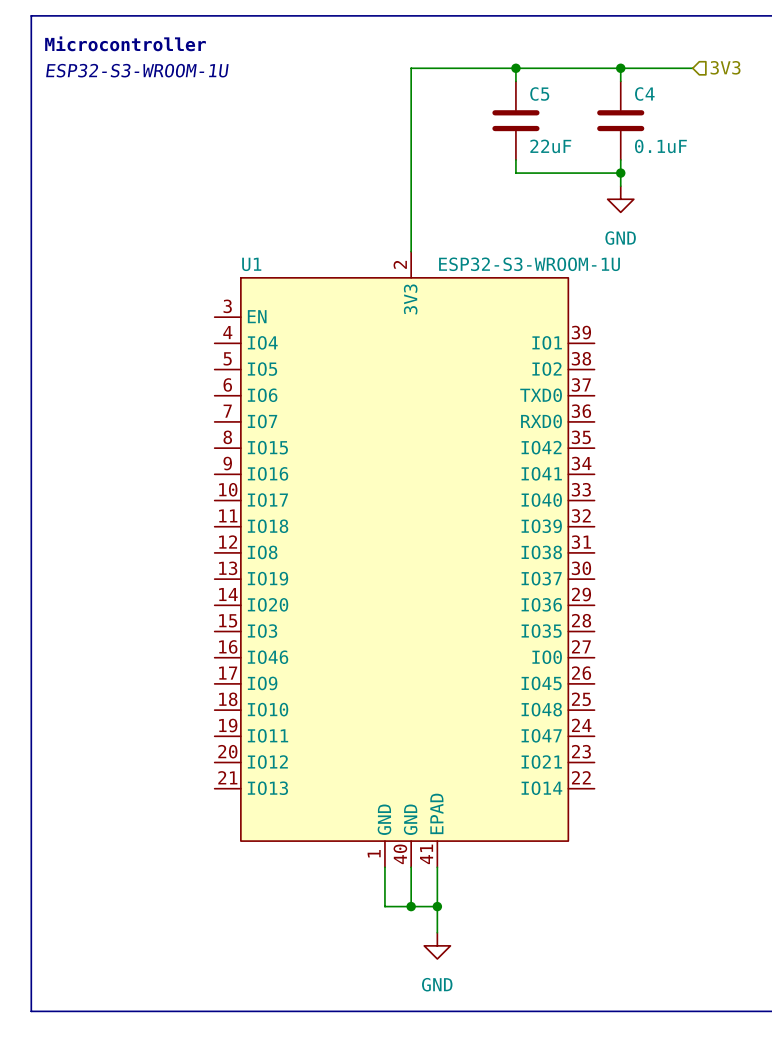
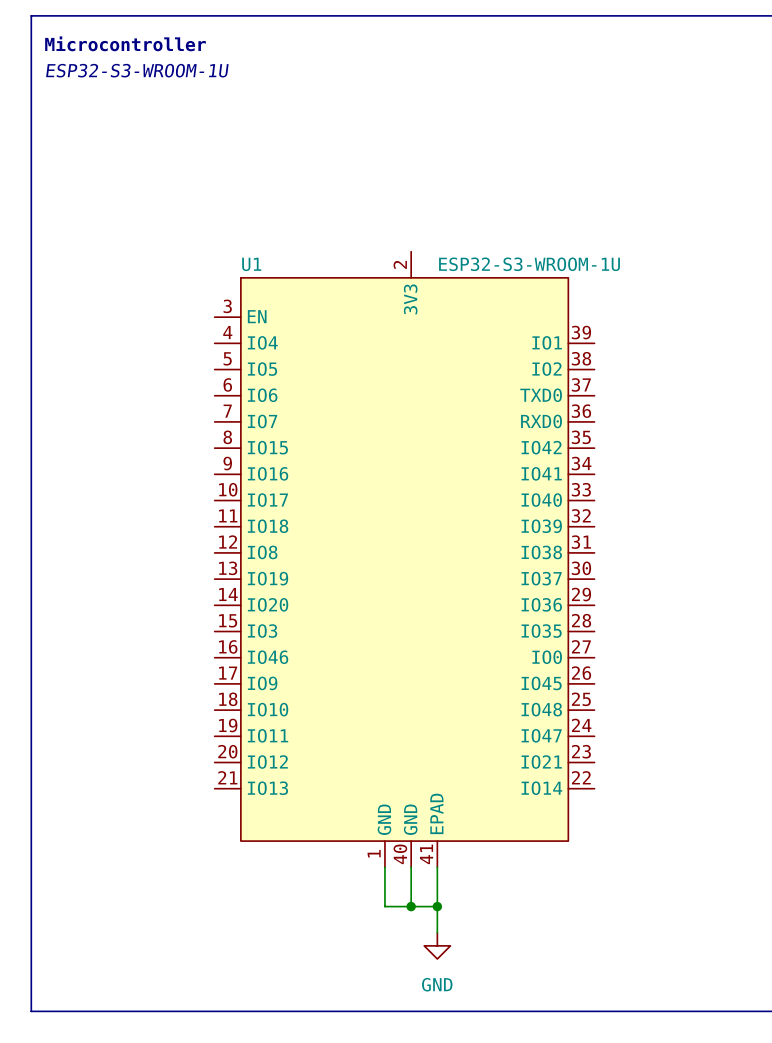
hierarchical label: 3V3 (725, 67) -> none
wire: (515, 68) (515, 81) -> none
junction: (515, 68) -> none
wire: (620, 68) (620, 81) -> none
junction: (620, 68) -> none
wire: (692, 68) (411, 68) (411, 251) -> none
C5: 22uF (515, 120) -> none
C4: 0.1uF (620, 120) -> none
wire: (515, 159) (515, 173) (620, 173) -> none
wire: (620, 159) (620, 186) -> none
junction: (620, 173) -> none
power symbol: GND (620, 199) -> none

